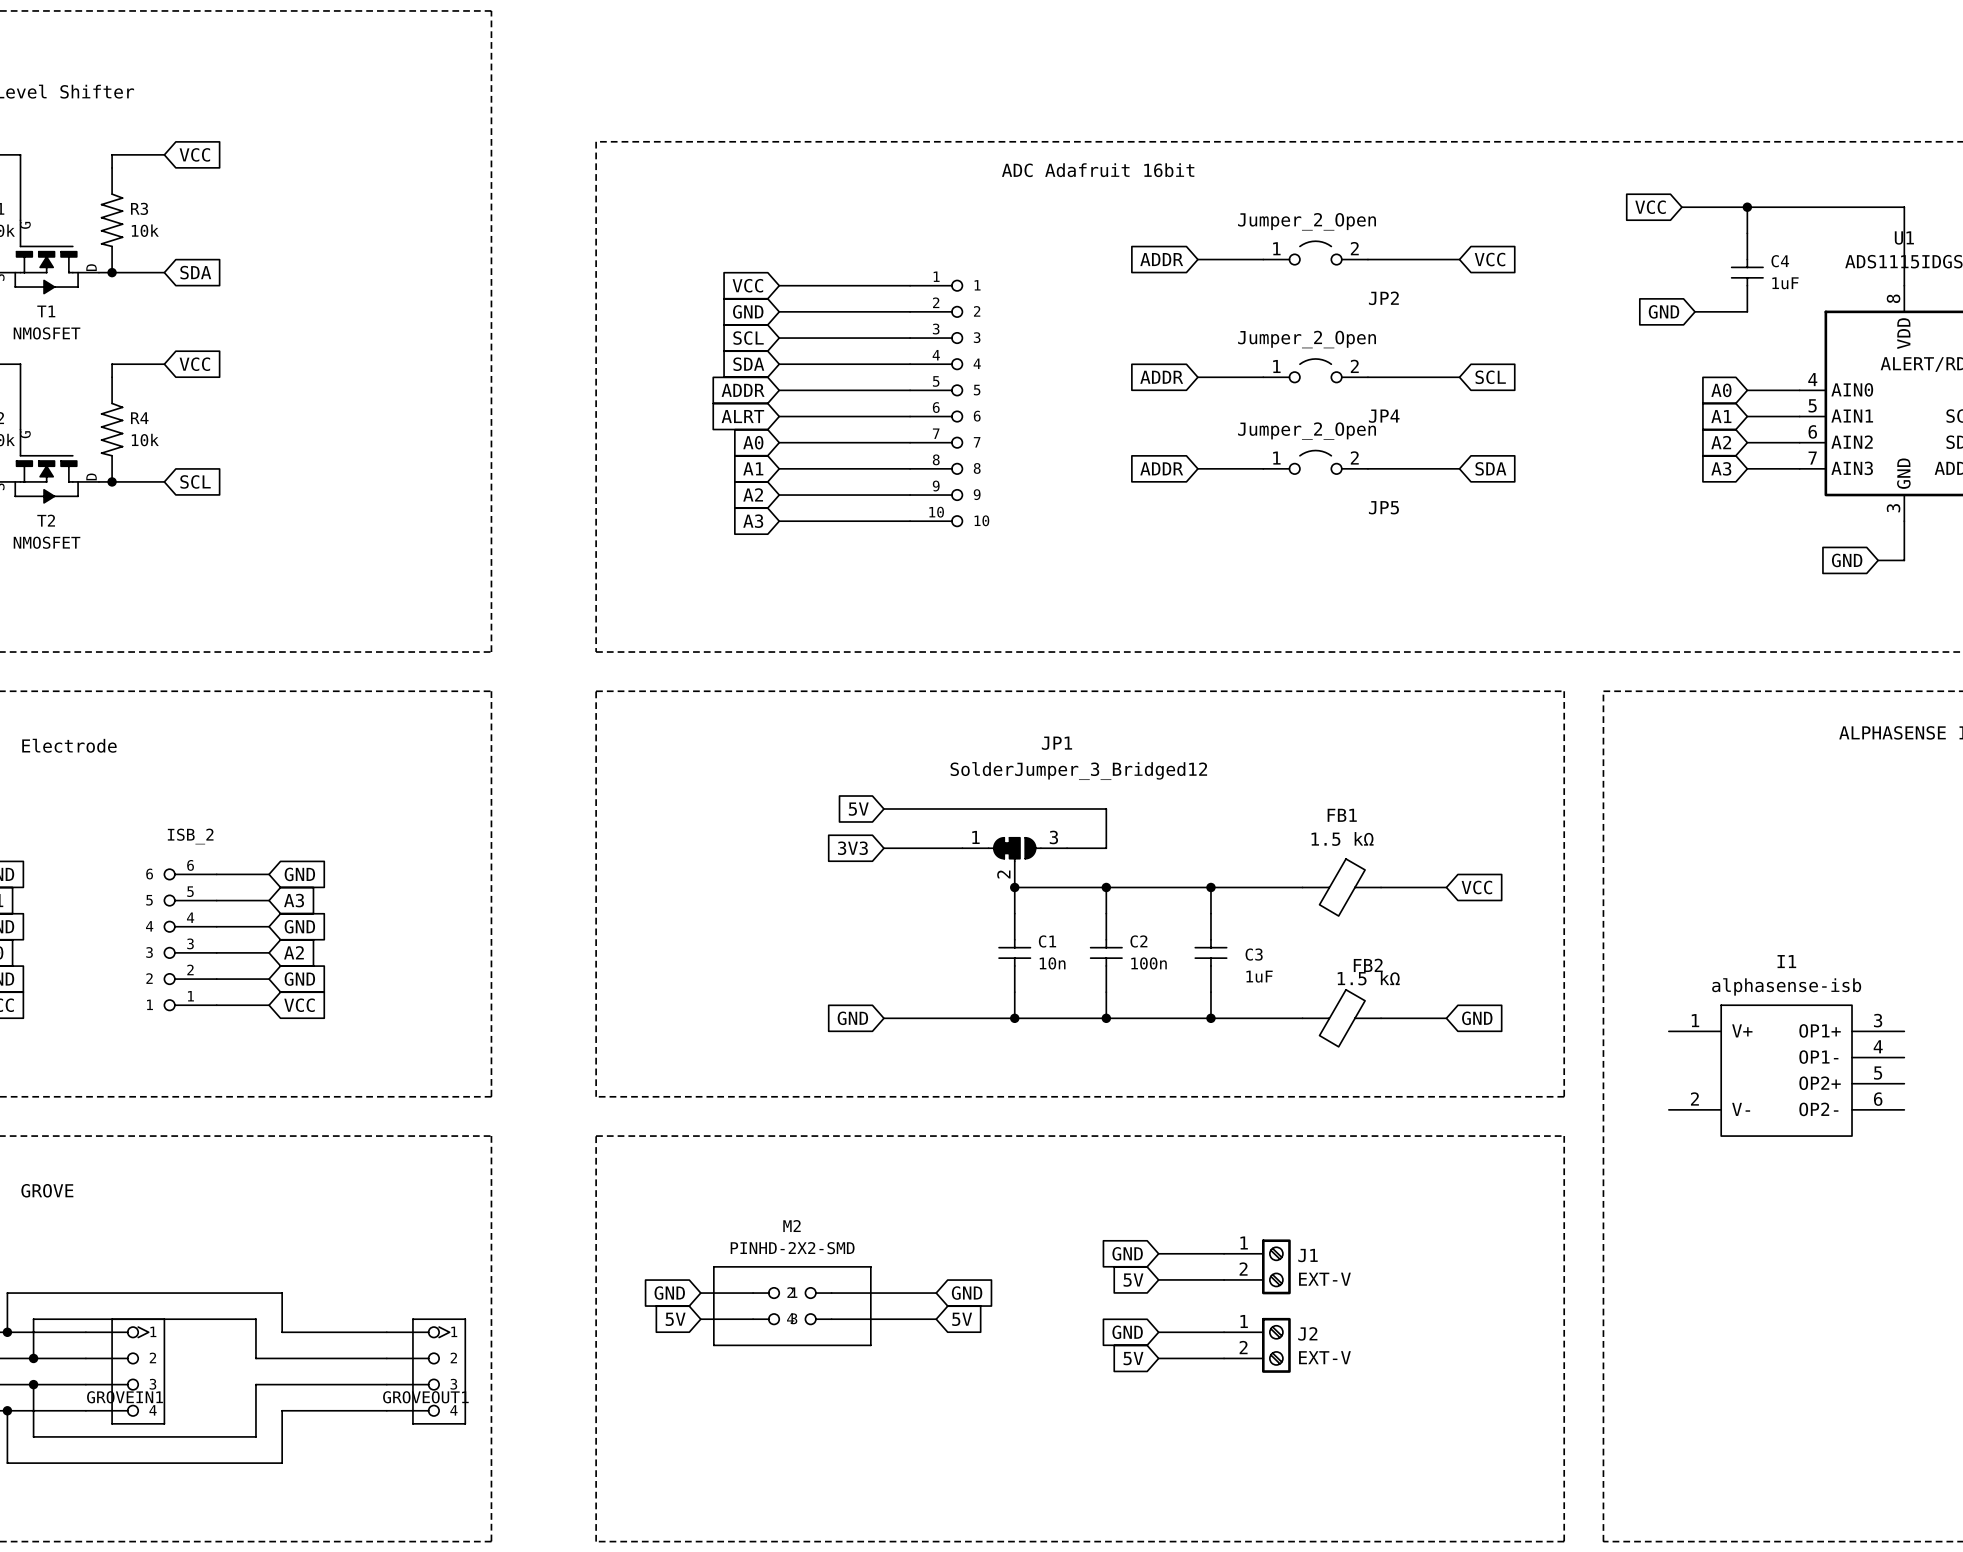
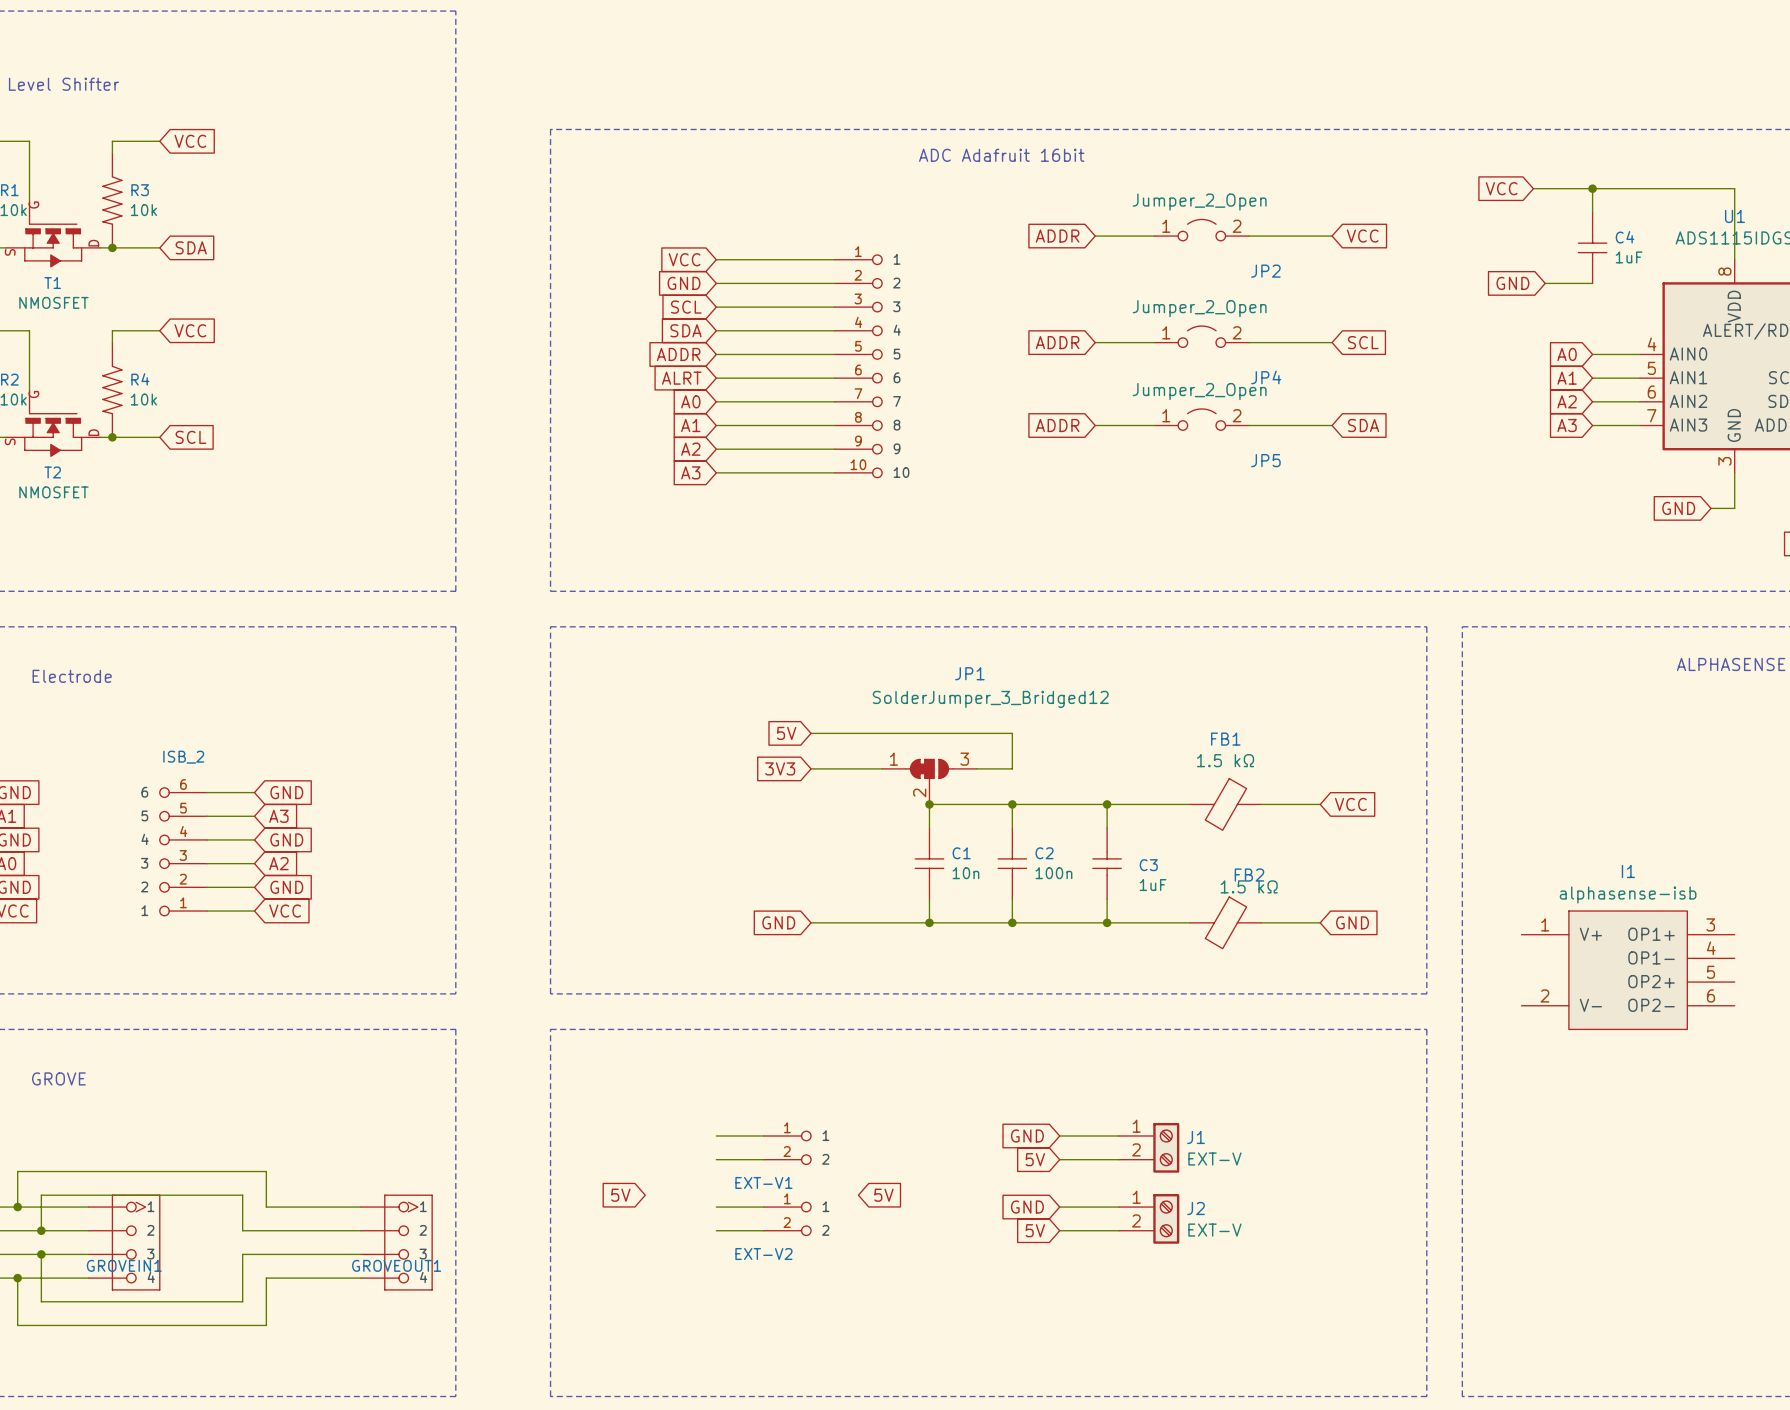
EXT-V1: none -> (787, 1147)
global label: GND (669, 1293) -> none
wire: (700, 1293) (753, 1293) -> (716, 1136) (763, 1136)
wire: (831, 1293) (936, 1293) -> none
global label: GND (967, 1293) -> none
M2: PINHD-2X2-SMD (792, 1306) -> none
wire: (700, 1319) (753, 1319) -> (716, 1159) (763, 1159)
wire: (831, 1319) (936, 1319) -> none
wire: none -> (716, 1207) (763, 1207)
EXT-V2: none -> (787, 1218)
wire: none -> (716, 1230) (763, 1230)

